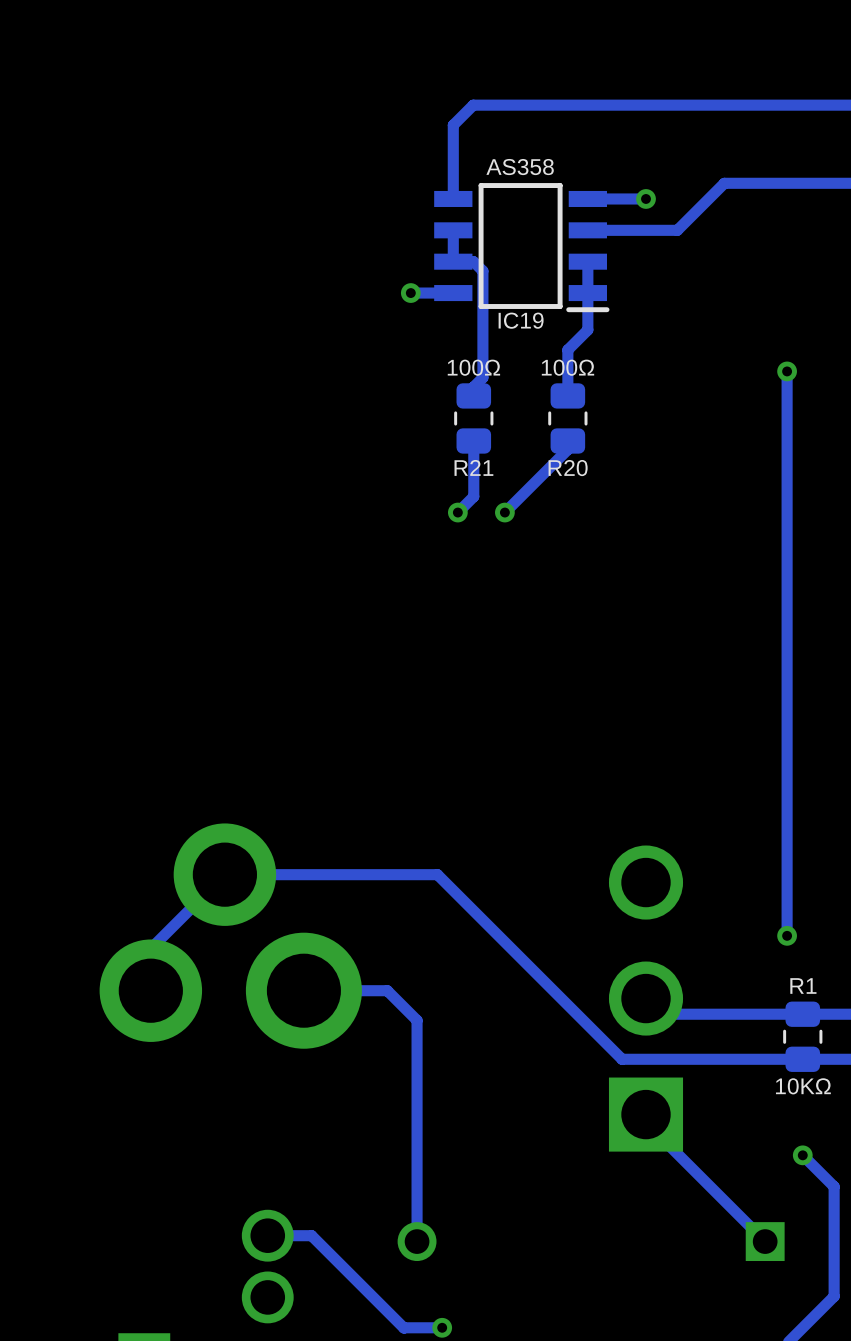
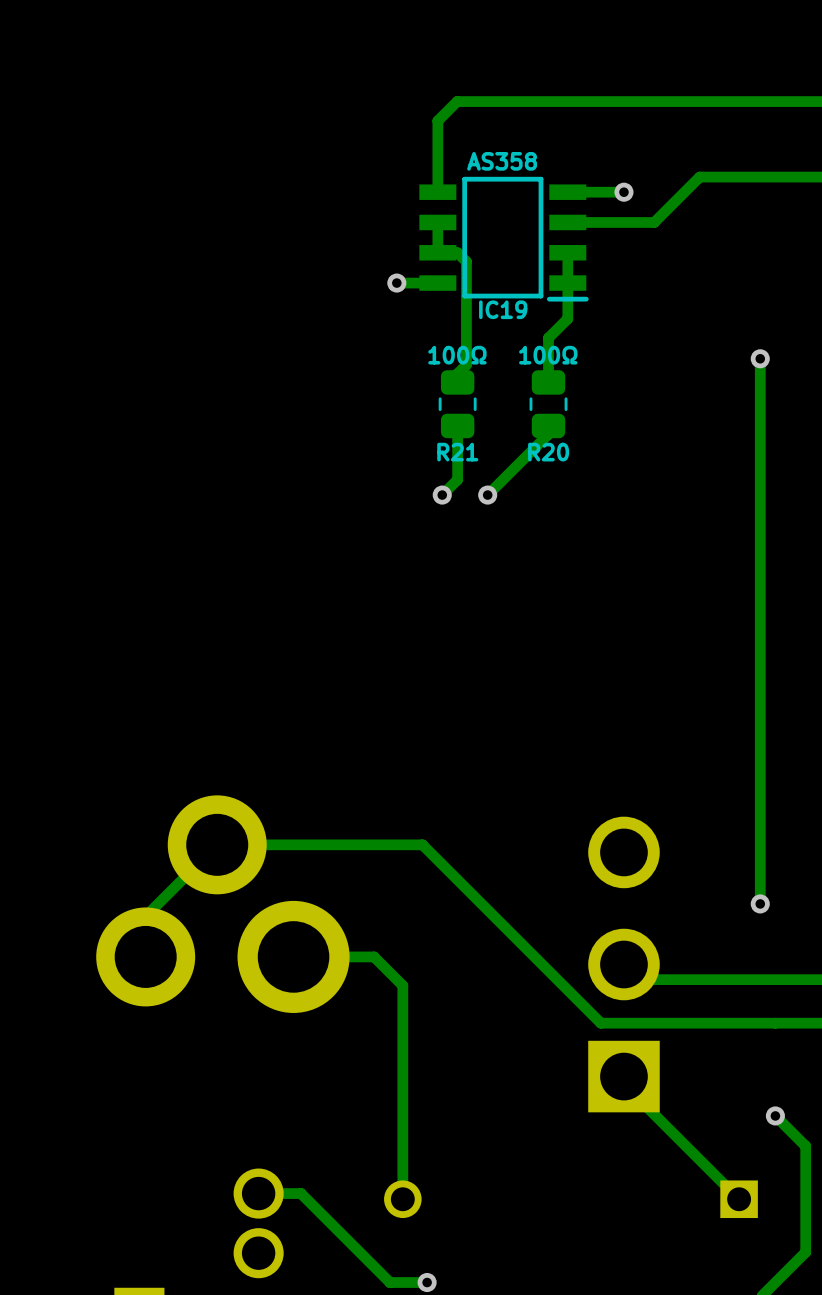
R1: (802, 1036) -> none

